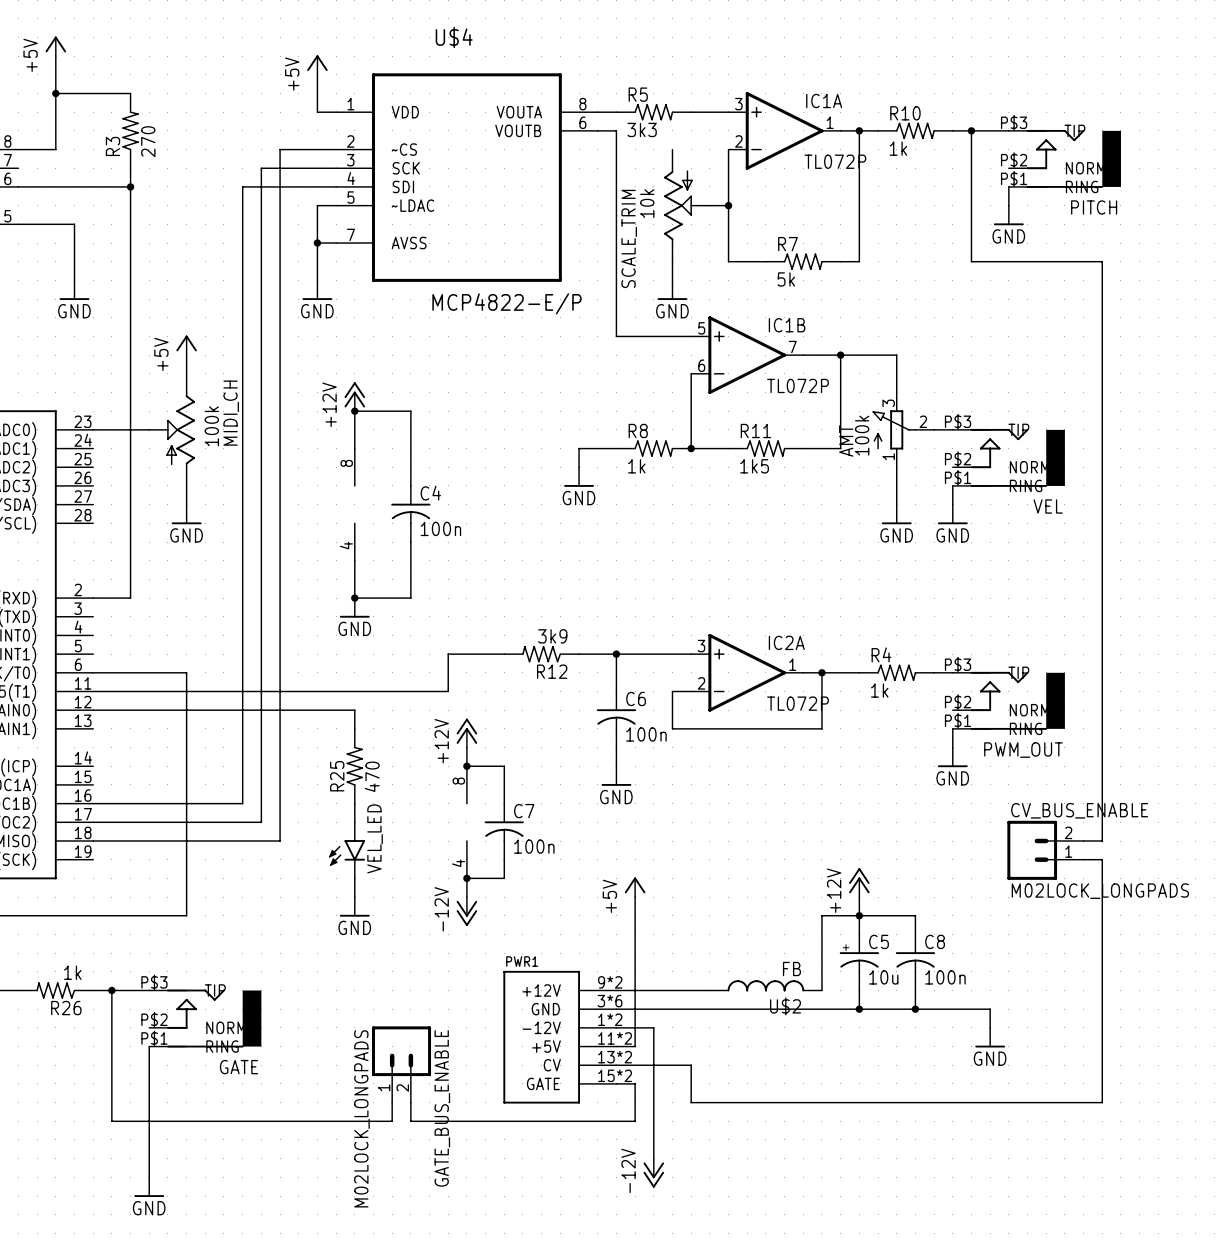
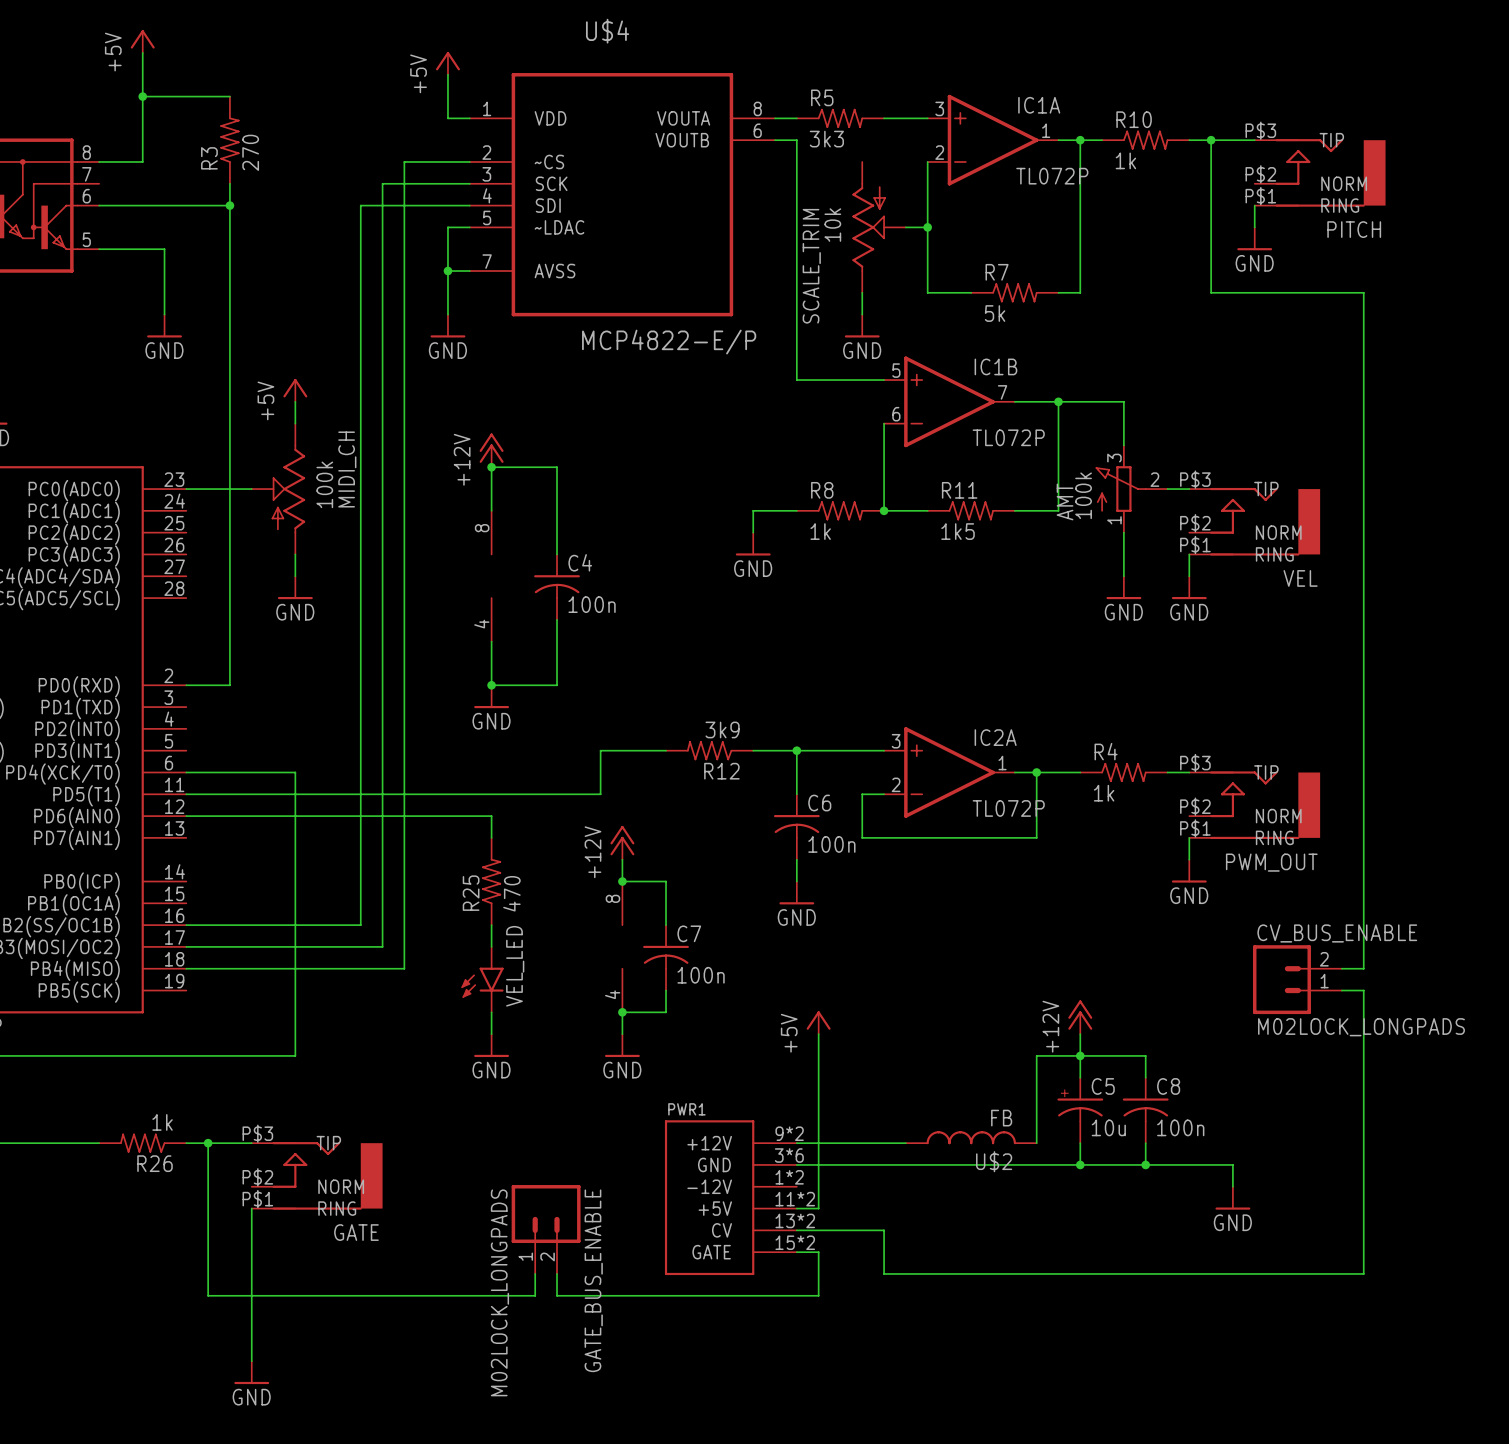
power symbol: -12V (466, 911) -> GND (622, 1045)
wire: (616, 1027) (653, 1027) (653, 1158) -> none
power symbol: -12V (653, 1173) -> none

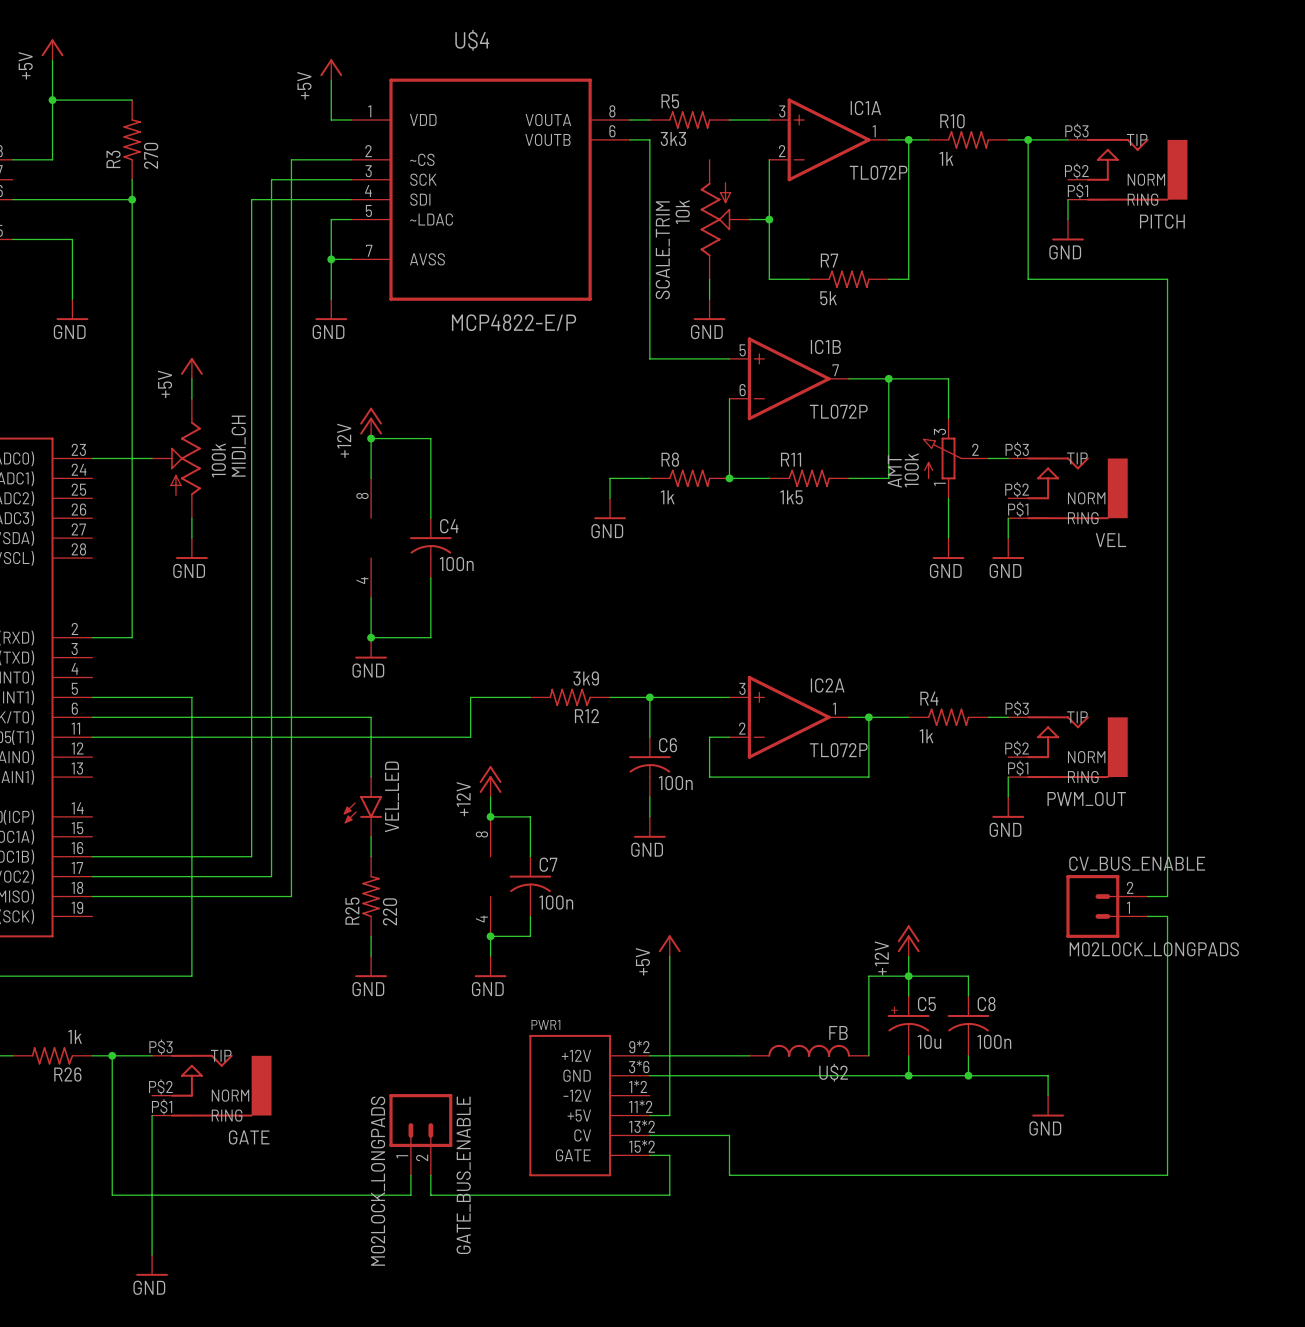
wire: (186, 816) (491, 816) -> (92, 697) (191, 697) (191, 717) (371, 717) (371, 757)
R25 position: (491, 881) -> (371, 896)
R25 value: 470 (511, 893) -> 220 (390, 911)
VEL_LED position: (482, 979) -> (362, 806)

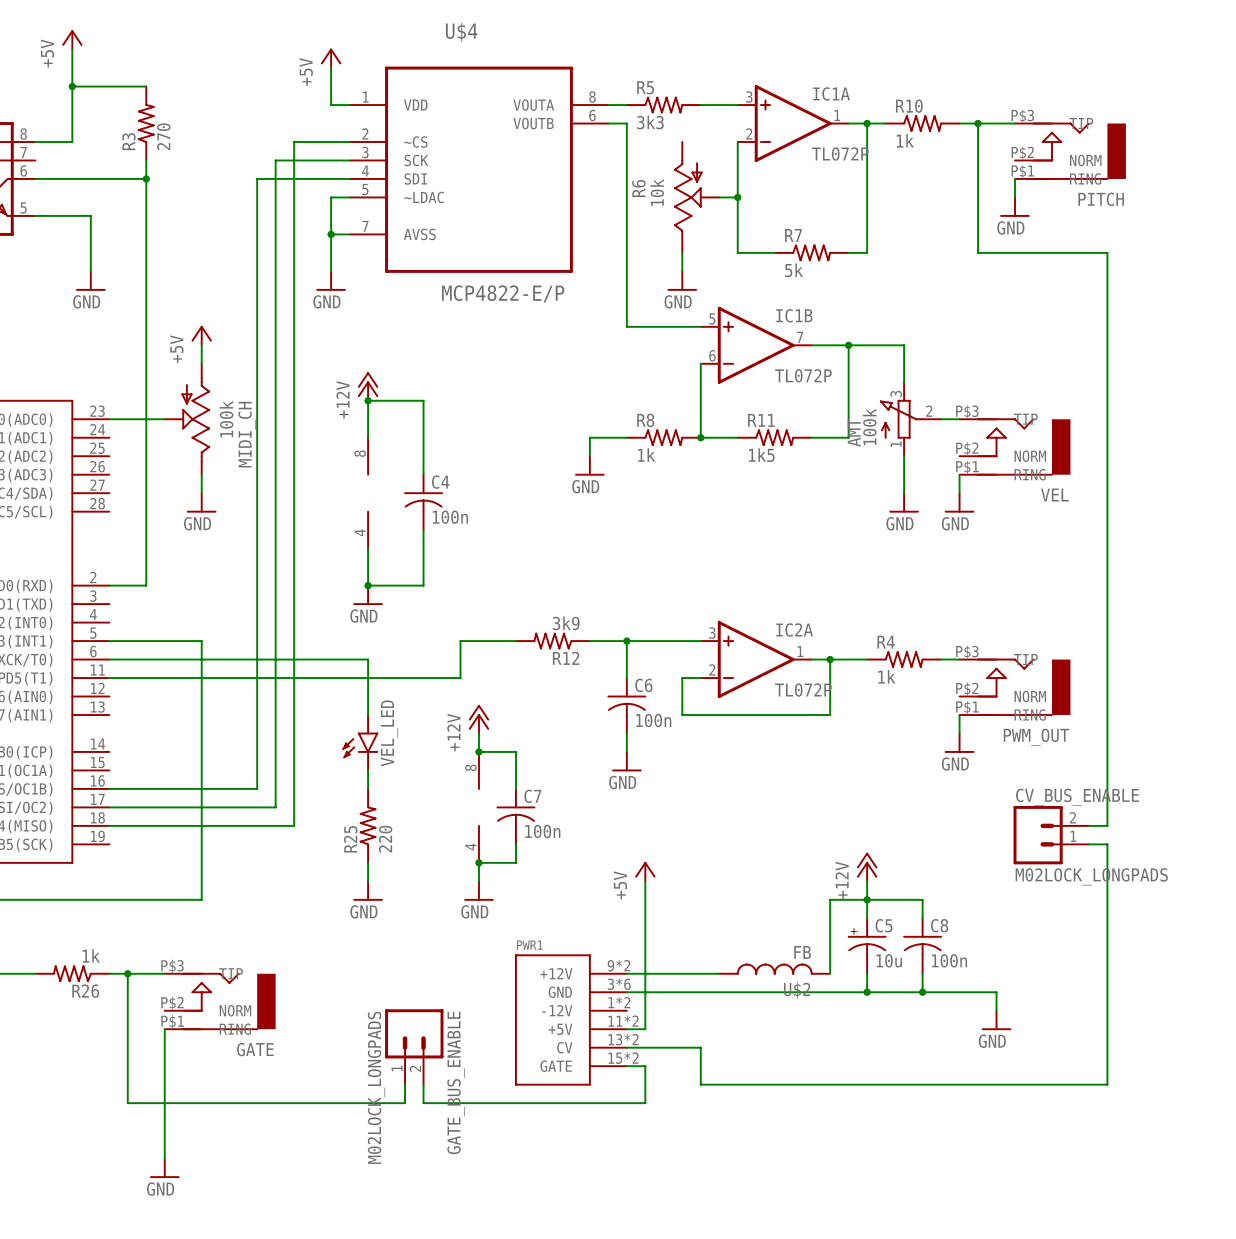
SCALE_TRIM name: SCALE_TRIM (662, 250) -> R6 (638, 188)
MIDI_CH flip: as is (185, 458) -> up-down (195, 419)

